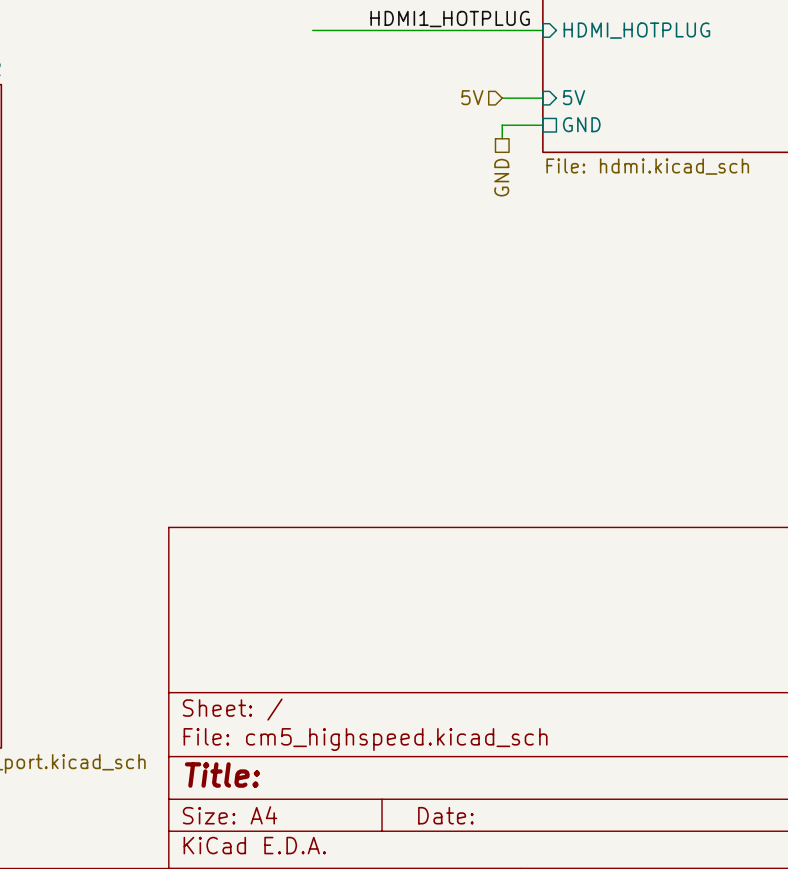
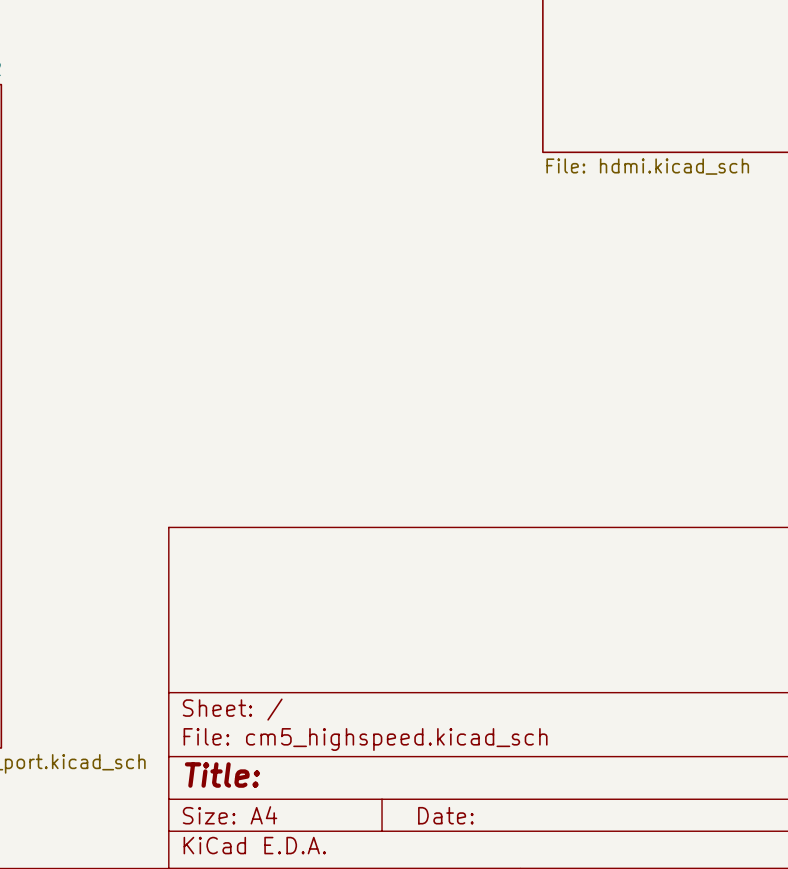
label: HDMI1_HOTPLUG (450, 19) -> none
wire: (312, 30) (542, 30) -> none
sheet pin: HDMI_HOTPLUG (636, 30) -> none
hierarchical label: 5V (472, 97) -> none
sheet pin: 5V (574, 97) -> none
wire: (502, 98) (542, 98) -> none
sheet pin: GND (581, 124) -> none
wire: (542, 125) (502, 125) (502, 138) -> none
hierarchical label: GND (501, 177) -> none

